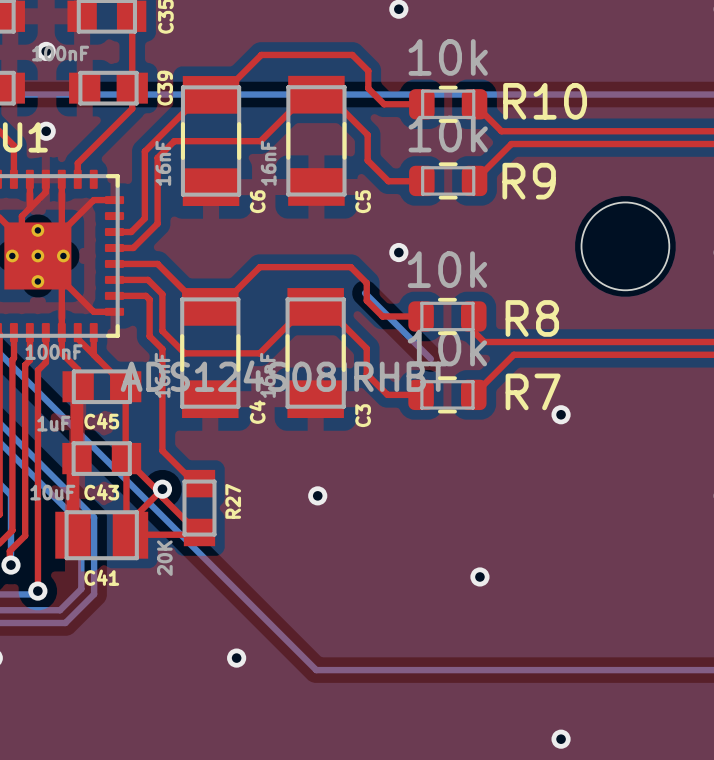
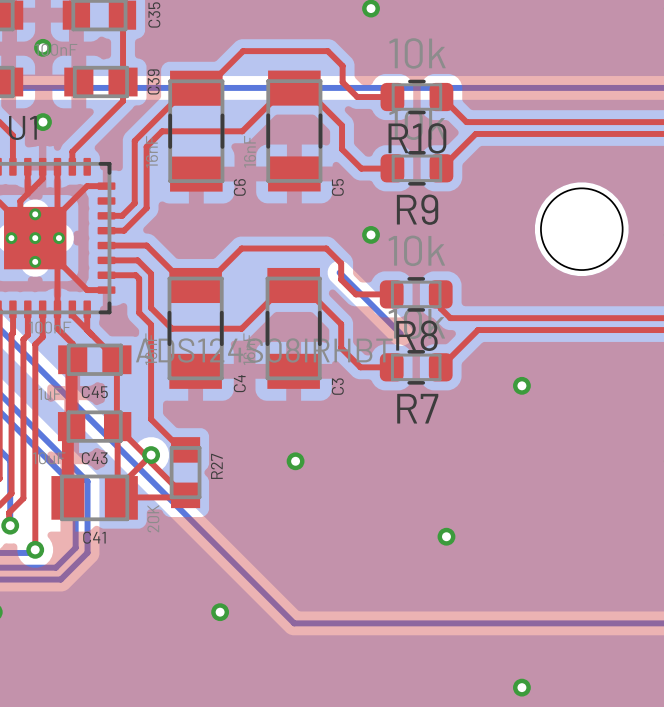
R10 name position: R10 (545, 101) -> R10 (417, 138)
R9 name position: R9 (529, 181) -> R9 (417, 209)
R8 name position: R8 (532, 318) -> R8 (416, 335)
R7 name position: R7 (533, 391) -> R7 (417, 408)

